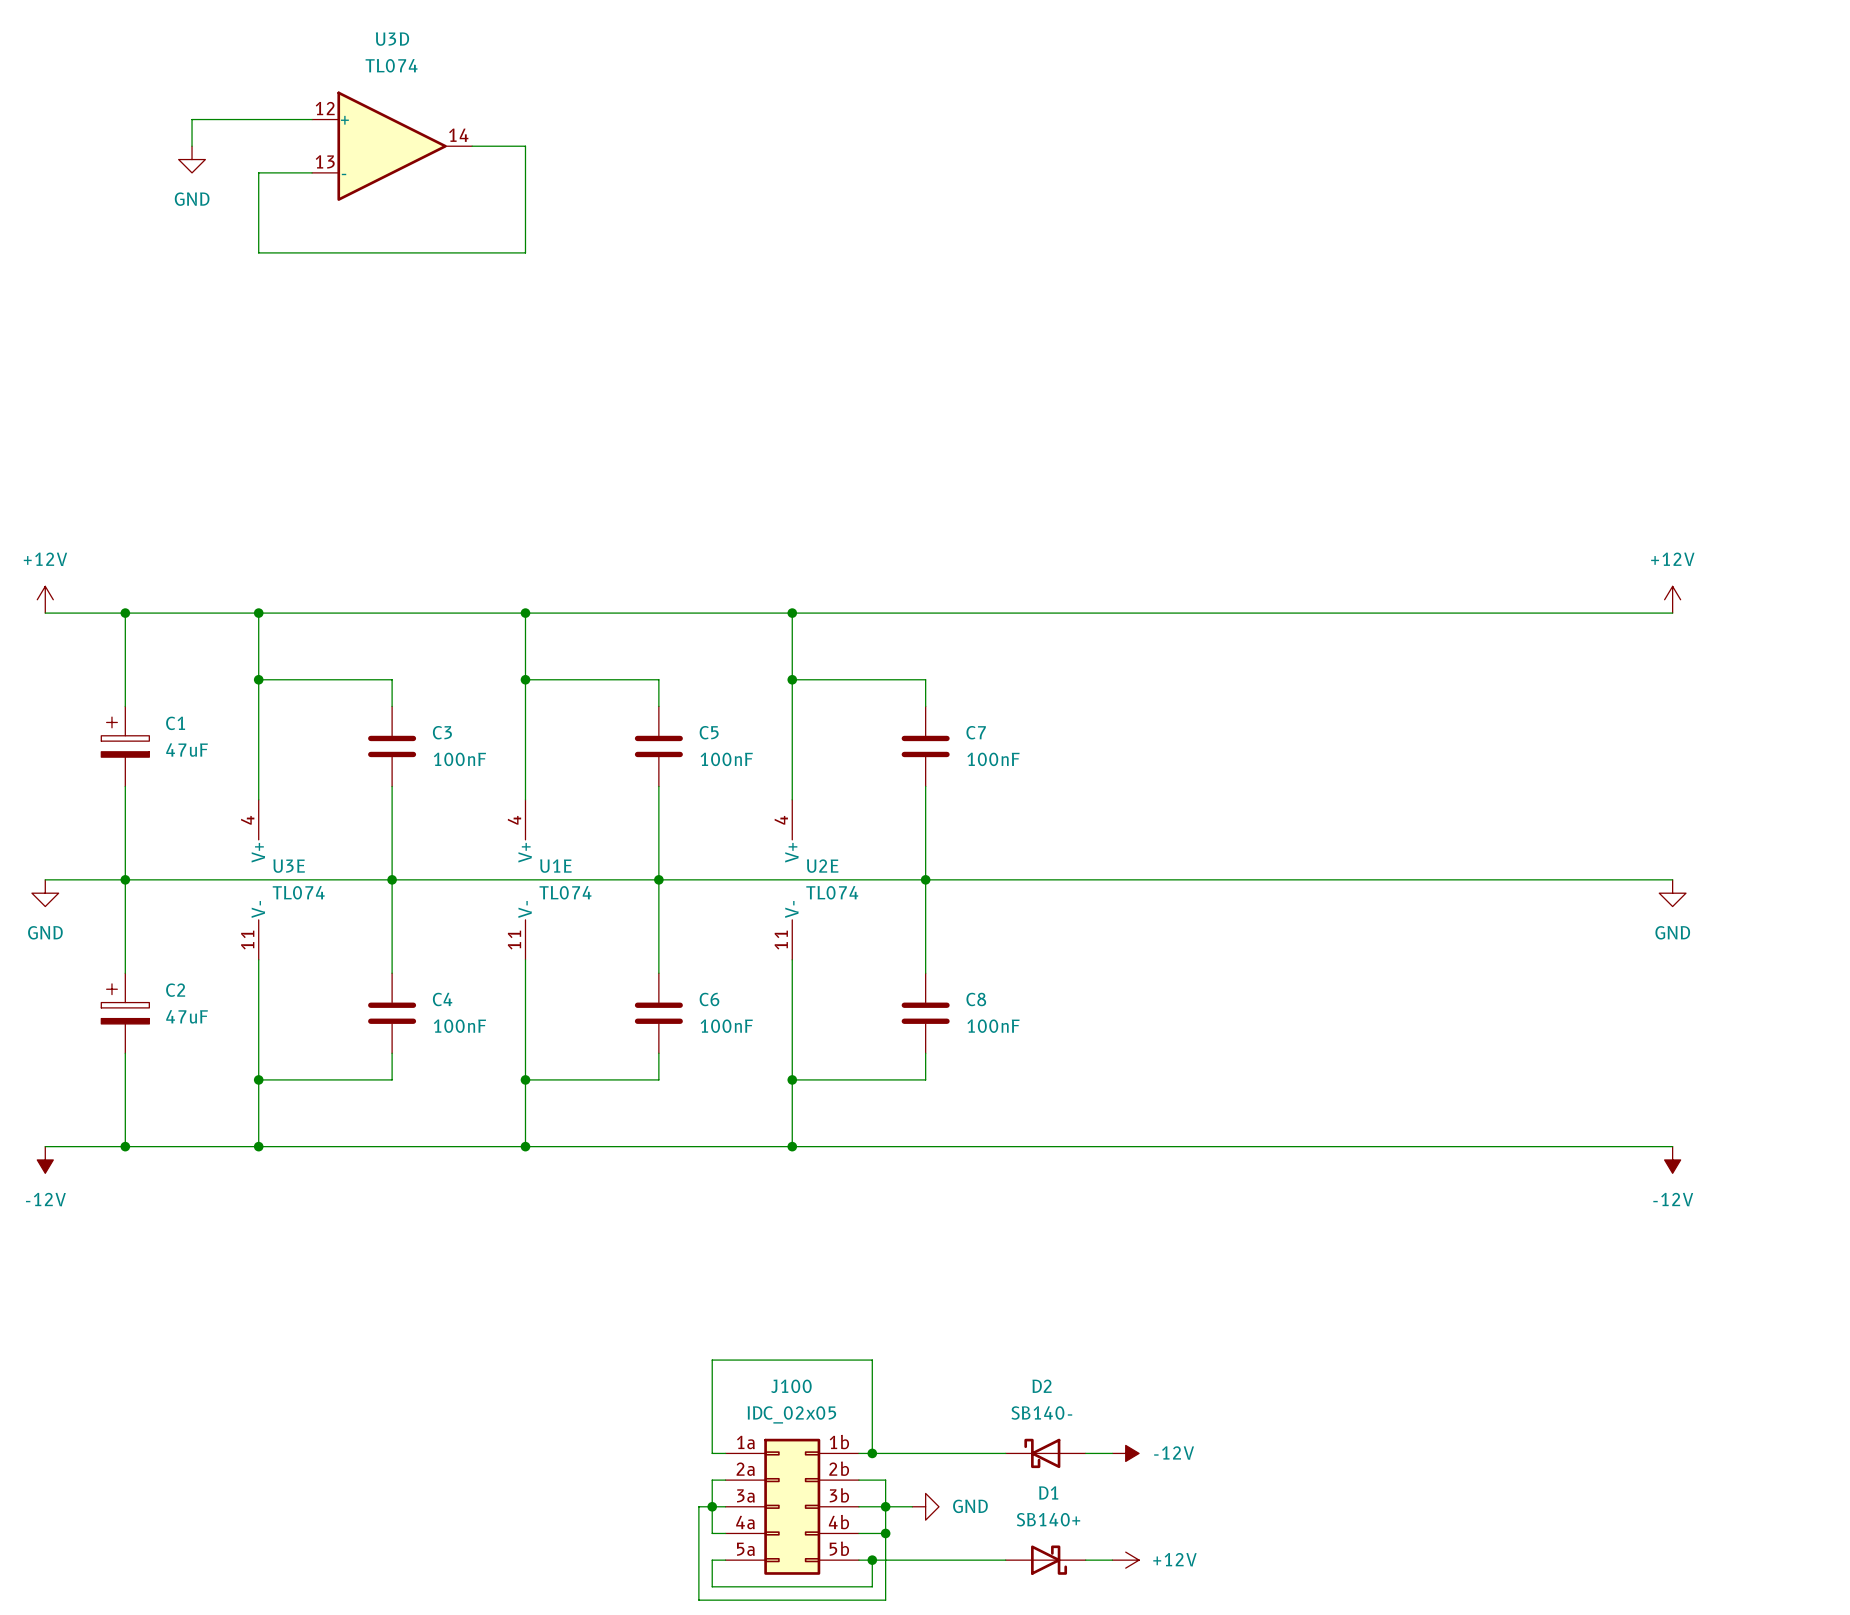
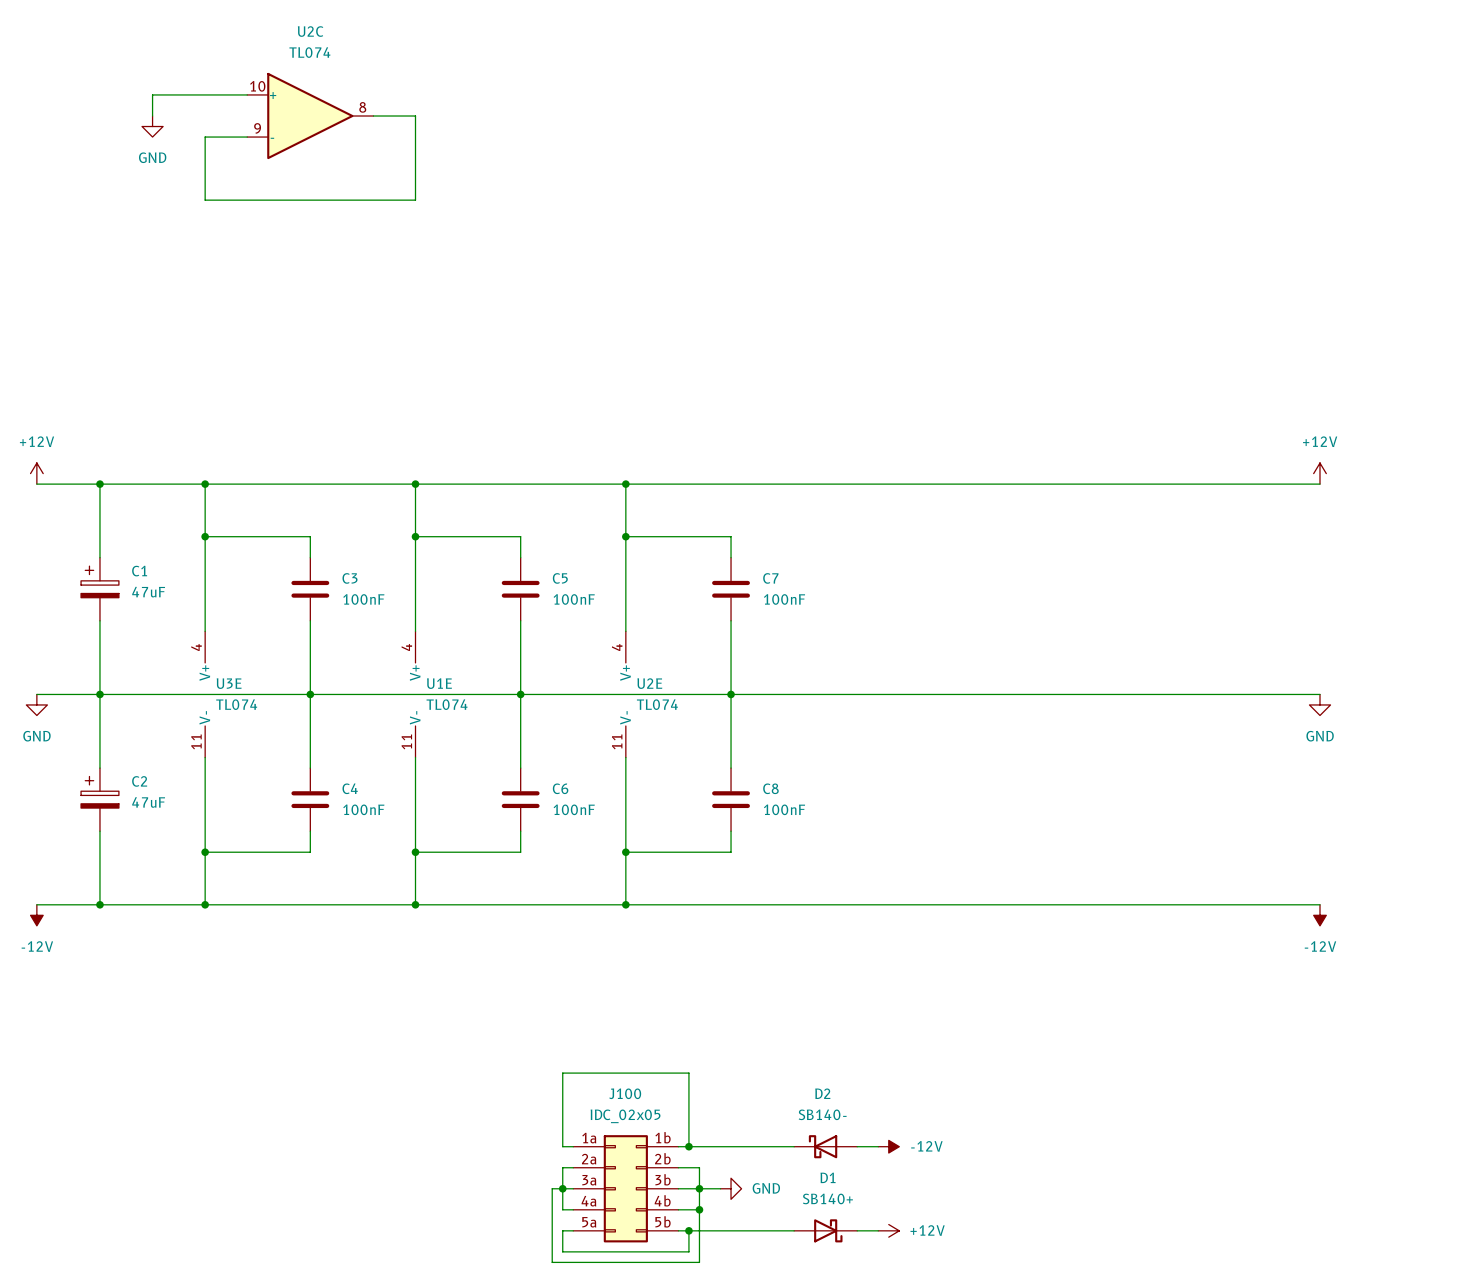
U3D name: U3D (392, 39) -> U2C (310, 31)
U3D pin number: 12 (325, 108) -> 10 (257, 86)
U3D pin number: 14 (458, 135) -> 8 (362, 107)
U3D pin number: 13 (325, 161) -> 9 (257, 128)

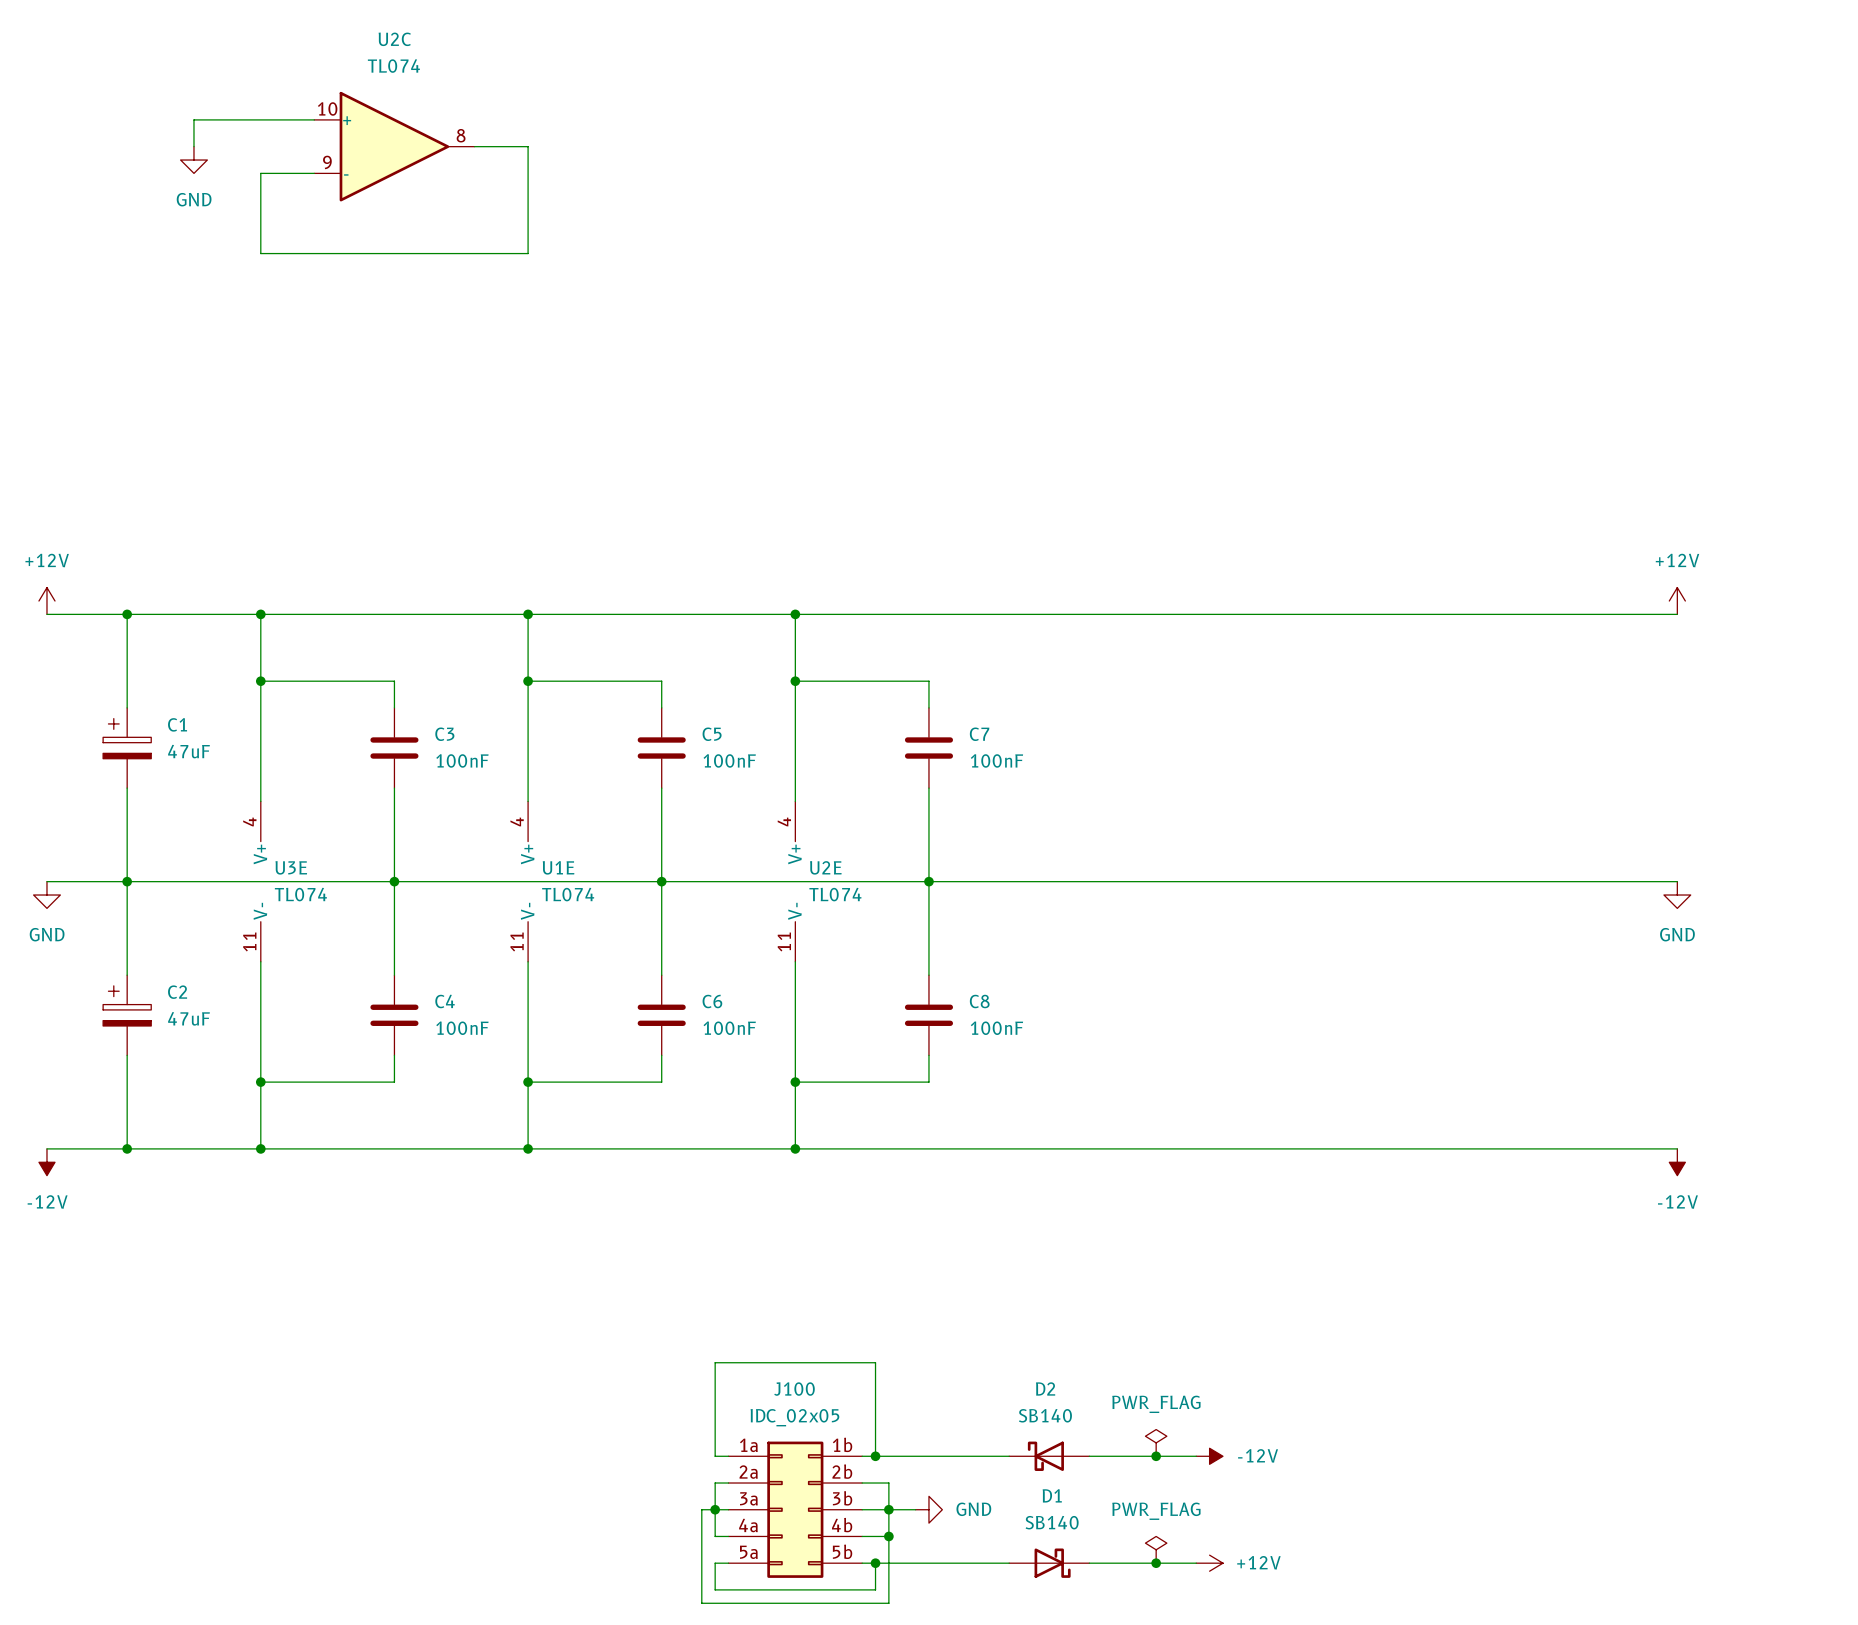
D2 value: SB140- (822, 1114) -> SB140 (1045, 1415)
power symbol: none -> PWR_FLAG (1156, 1442)
wire: none -> (1116, 1456) (1196, 1456)
power symbol position: -12V (888, 1146) -> -12V (1209, 1456)
junction: none -> (1156, 1456)
D1 value: SB140+ (827, 1198) -> SB140 (1052, 1522)
power symbol: none -> PWR_FLAG (1156, 1549)
wire: none -> (1116, 1563) (1196, 1563)
power symbol position: +12V (888, 1230) -> +12V (1209, 1563)
junction: none -> (1156, 1563)

